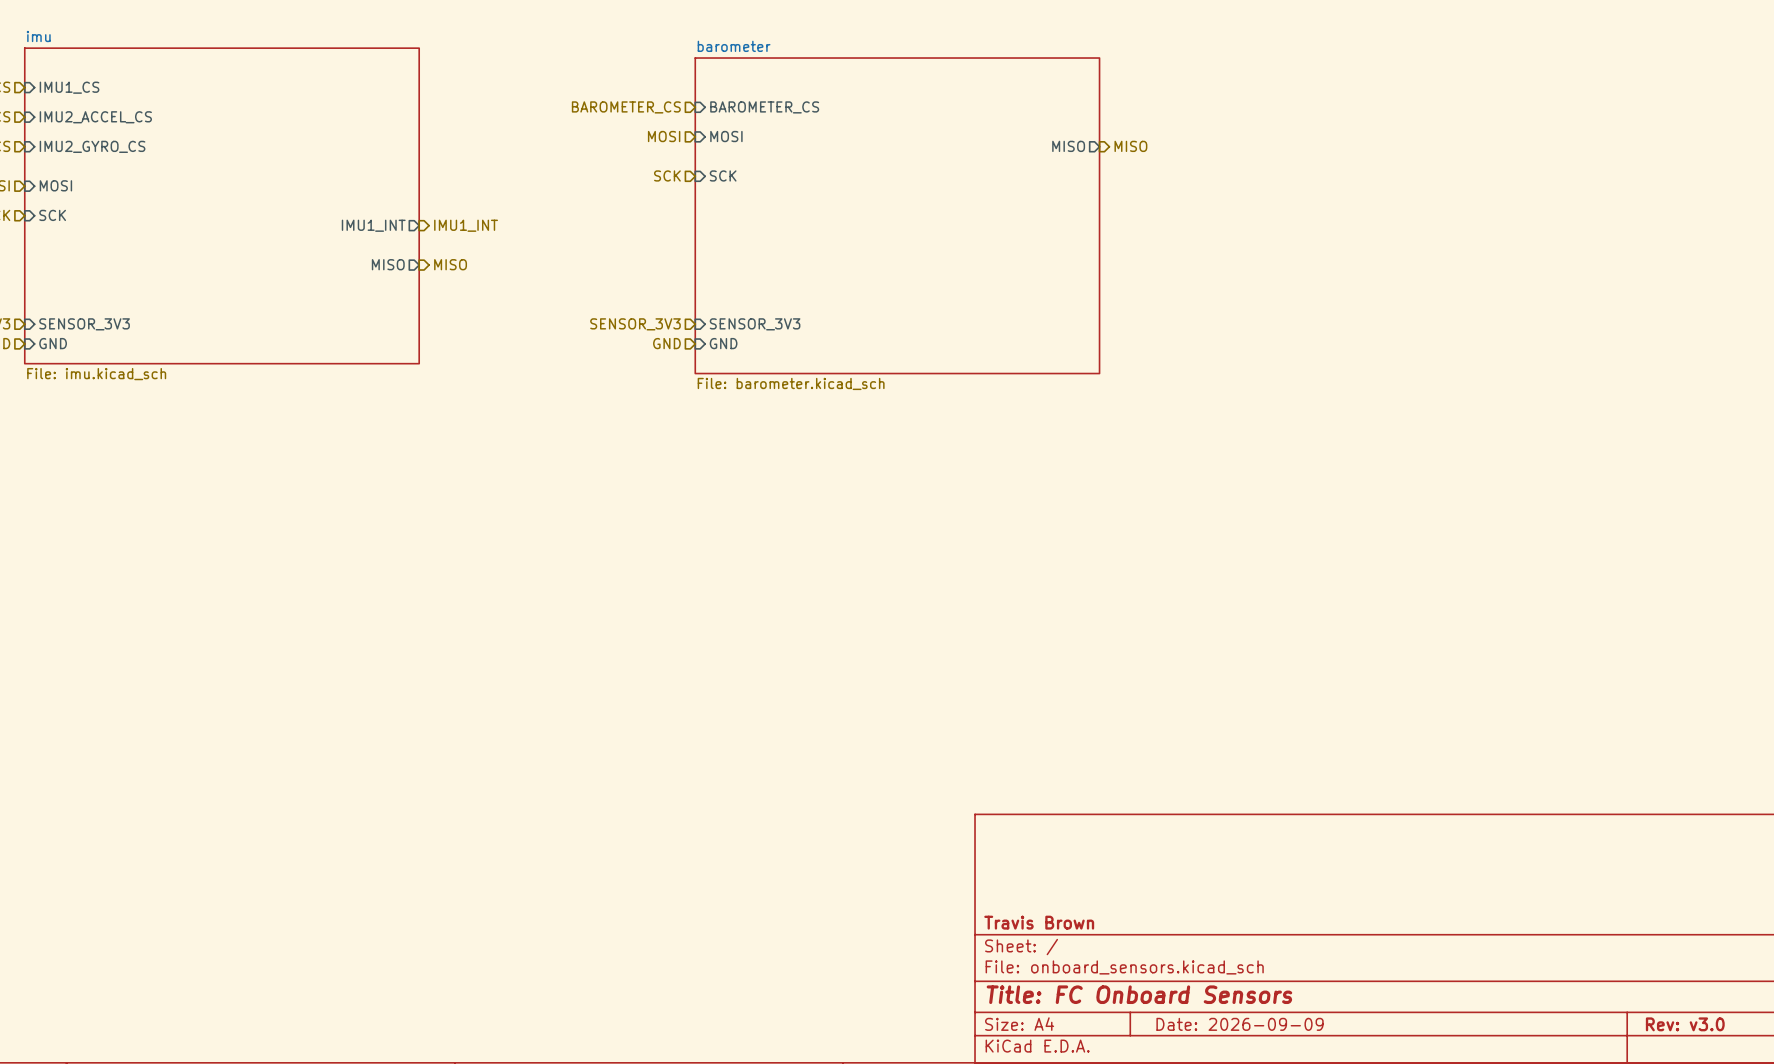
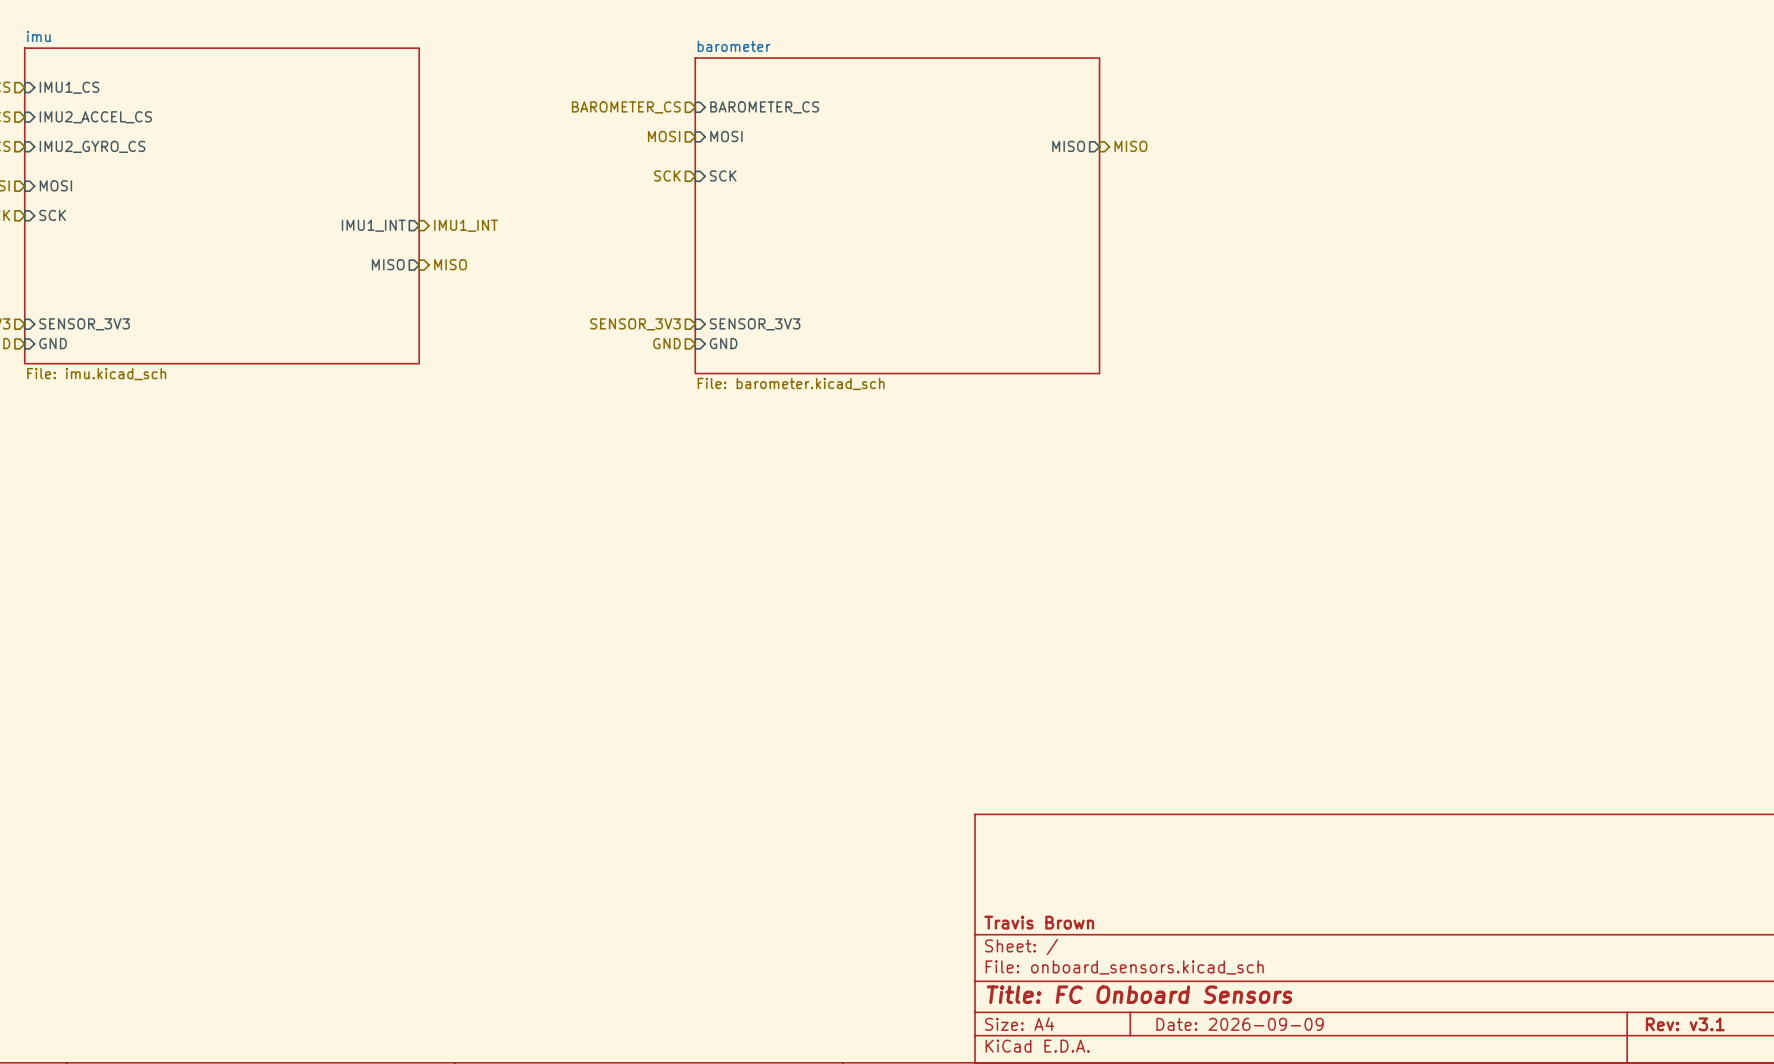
title block: Rev: v3.0 (1685, 1024) -> Rev: v3.1 (1685, 1024)

